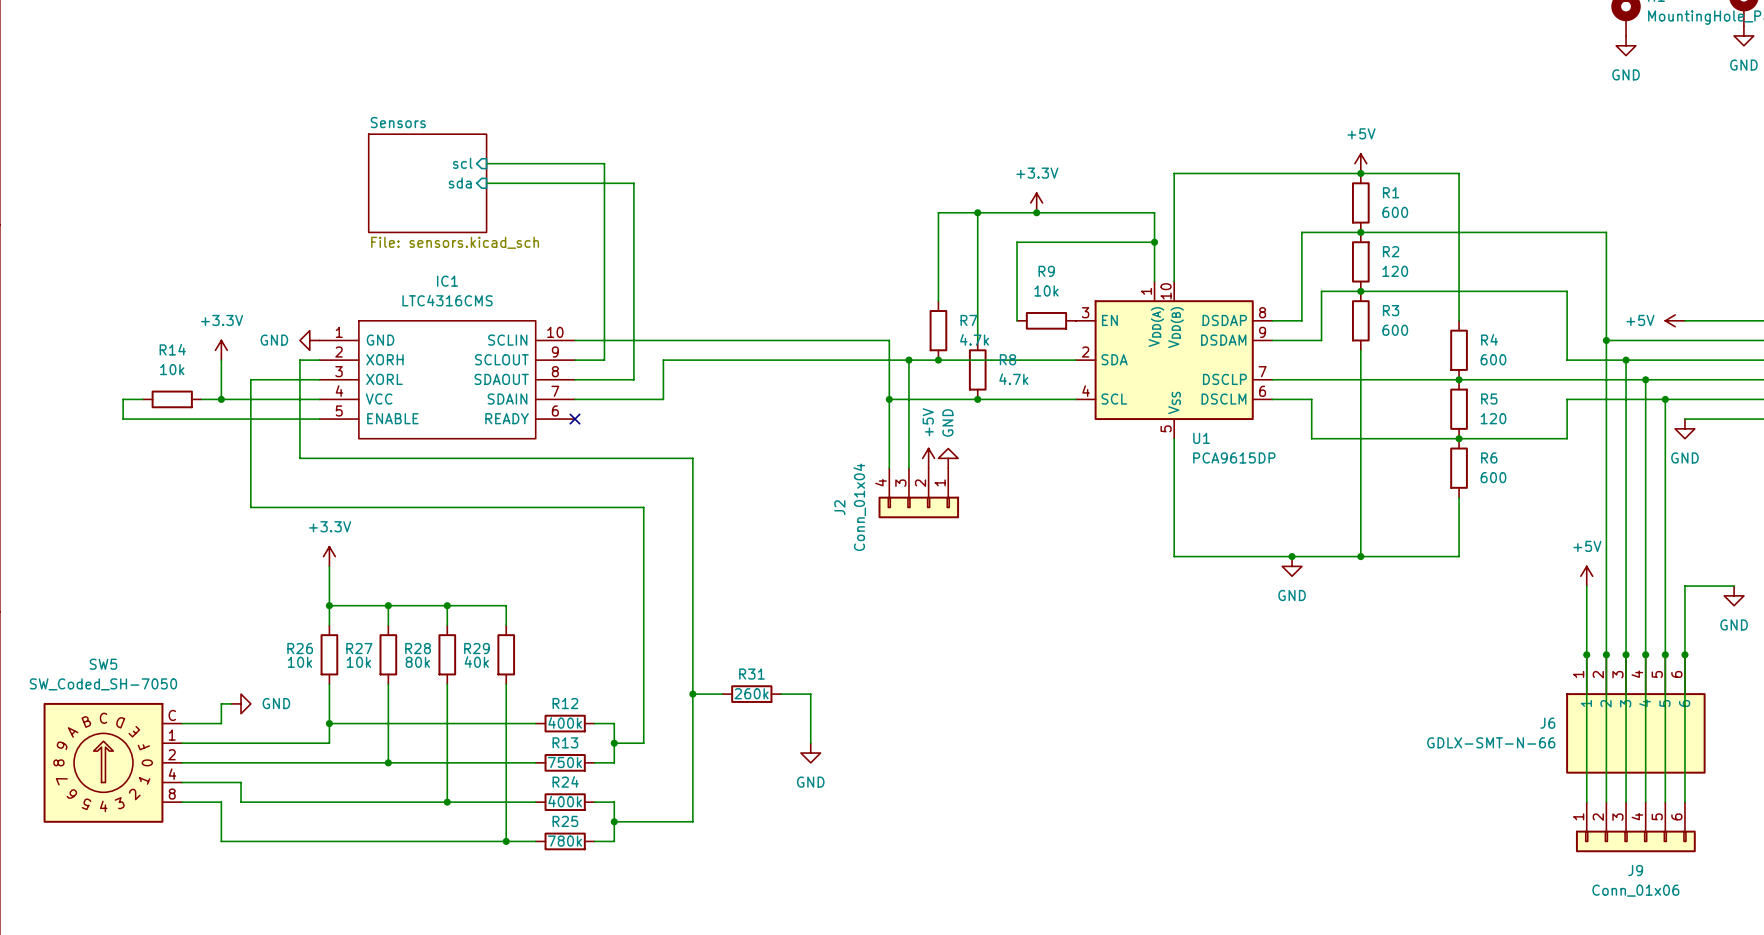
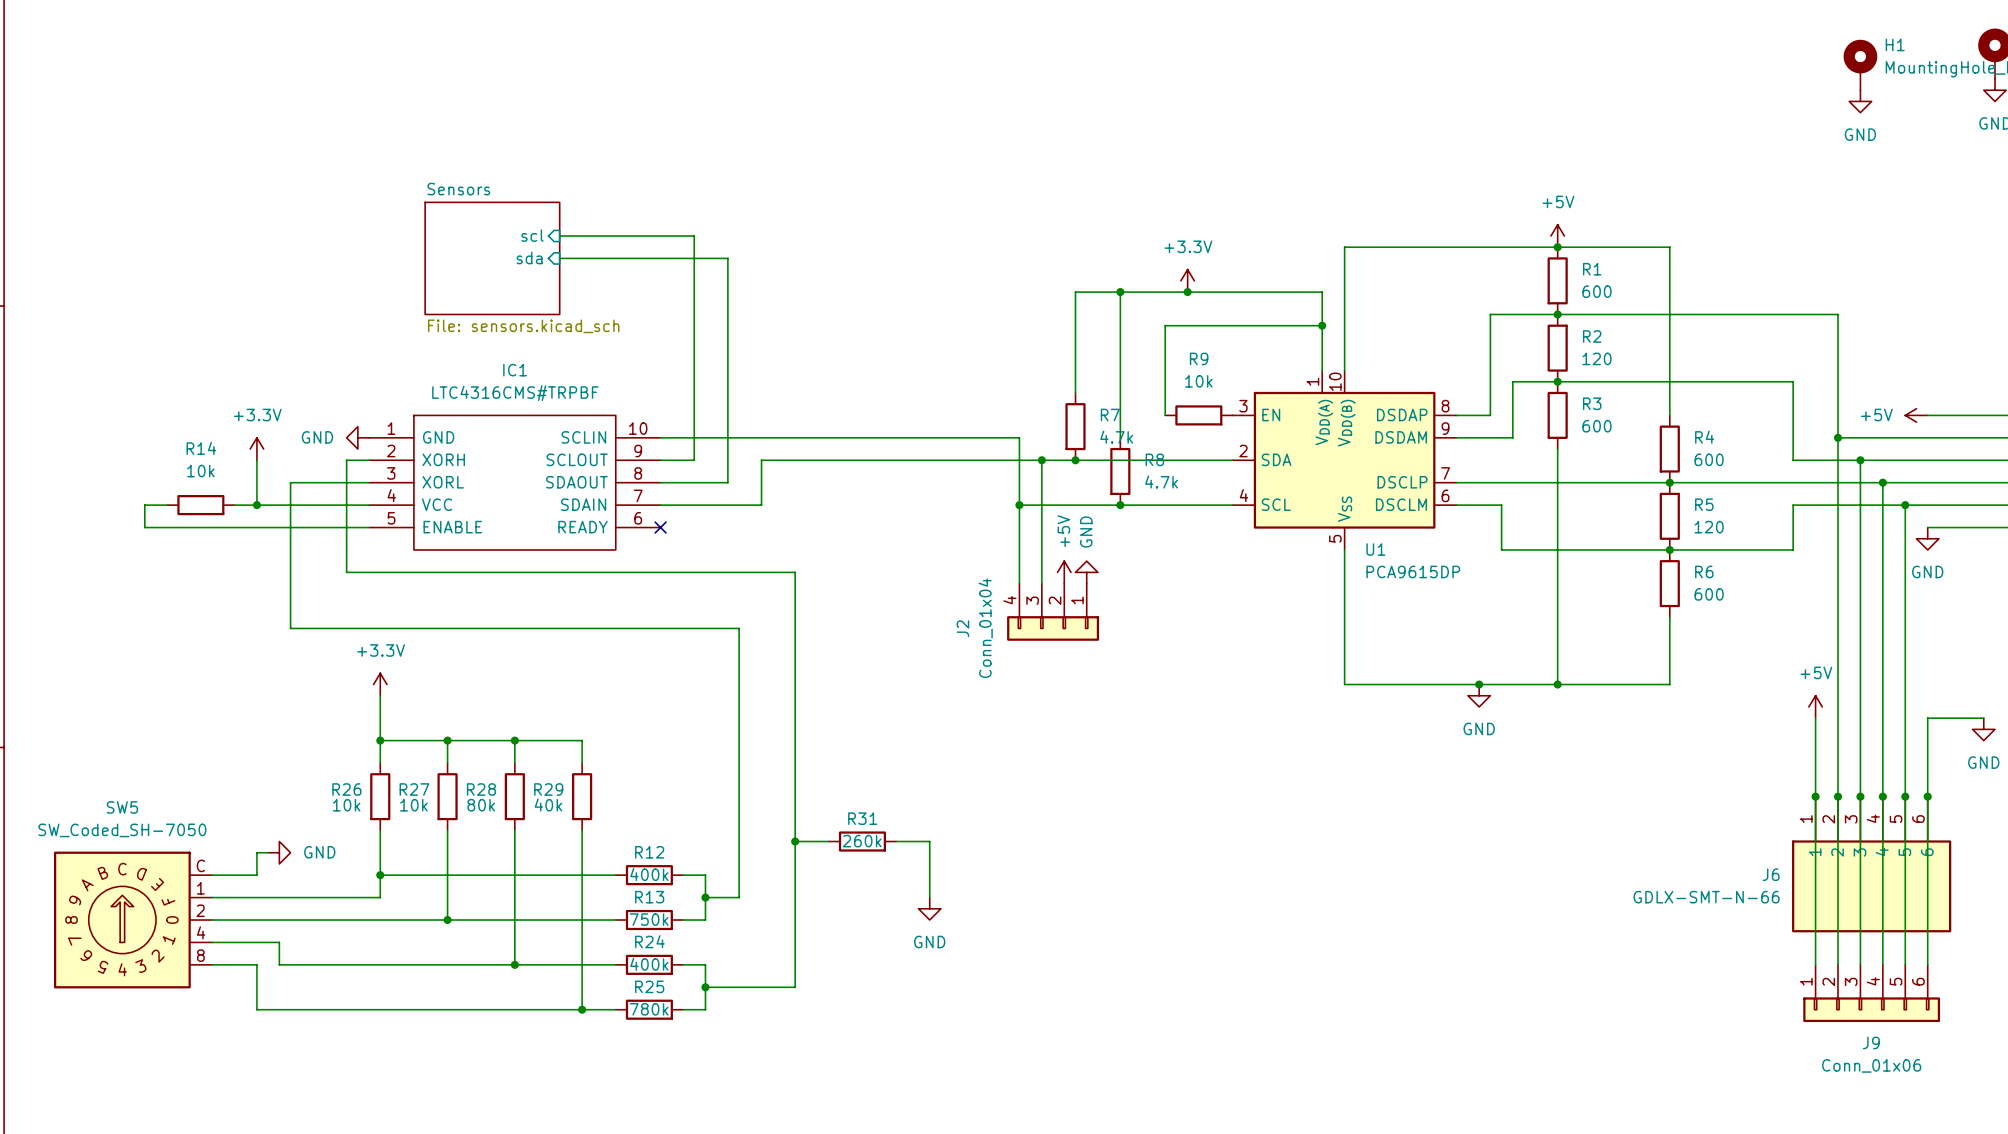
IC1 value: LTC4316CMS (447, 300) -> LTC4316CMS#TRPBF (515, 393)

